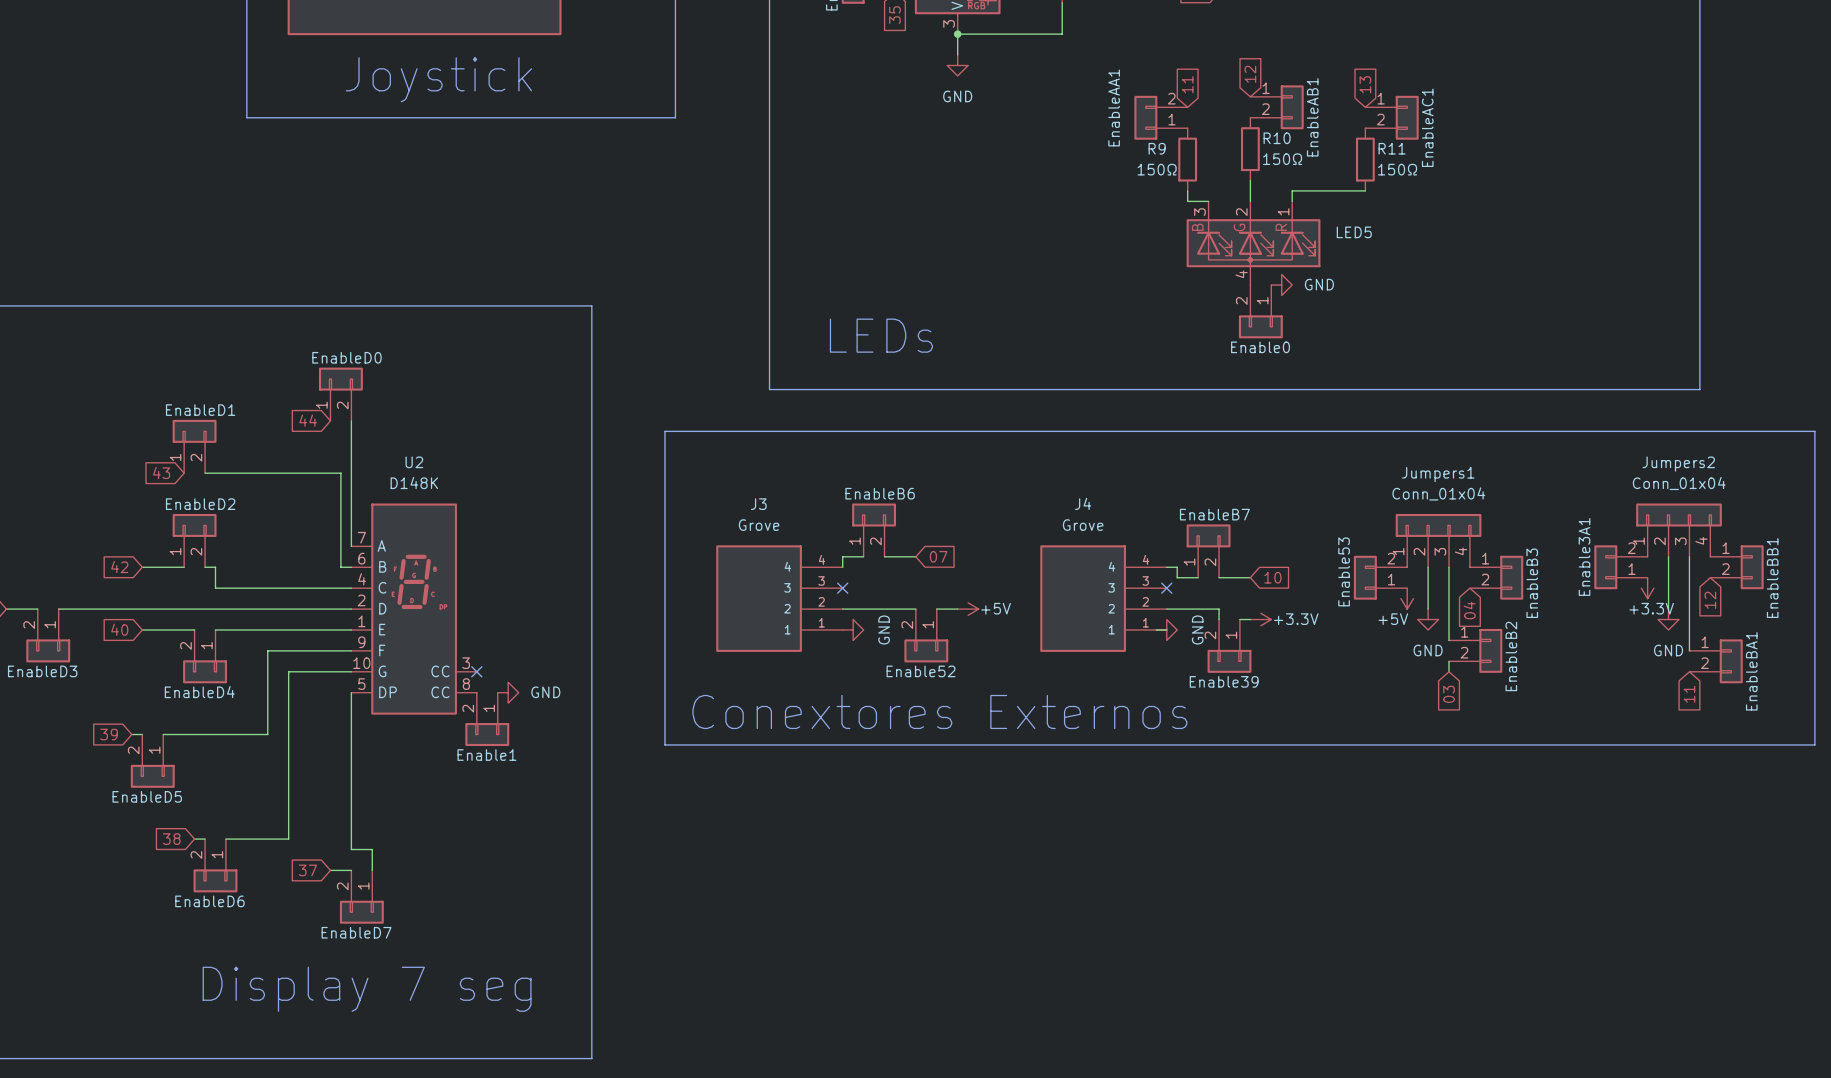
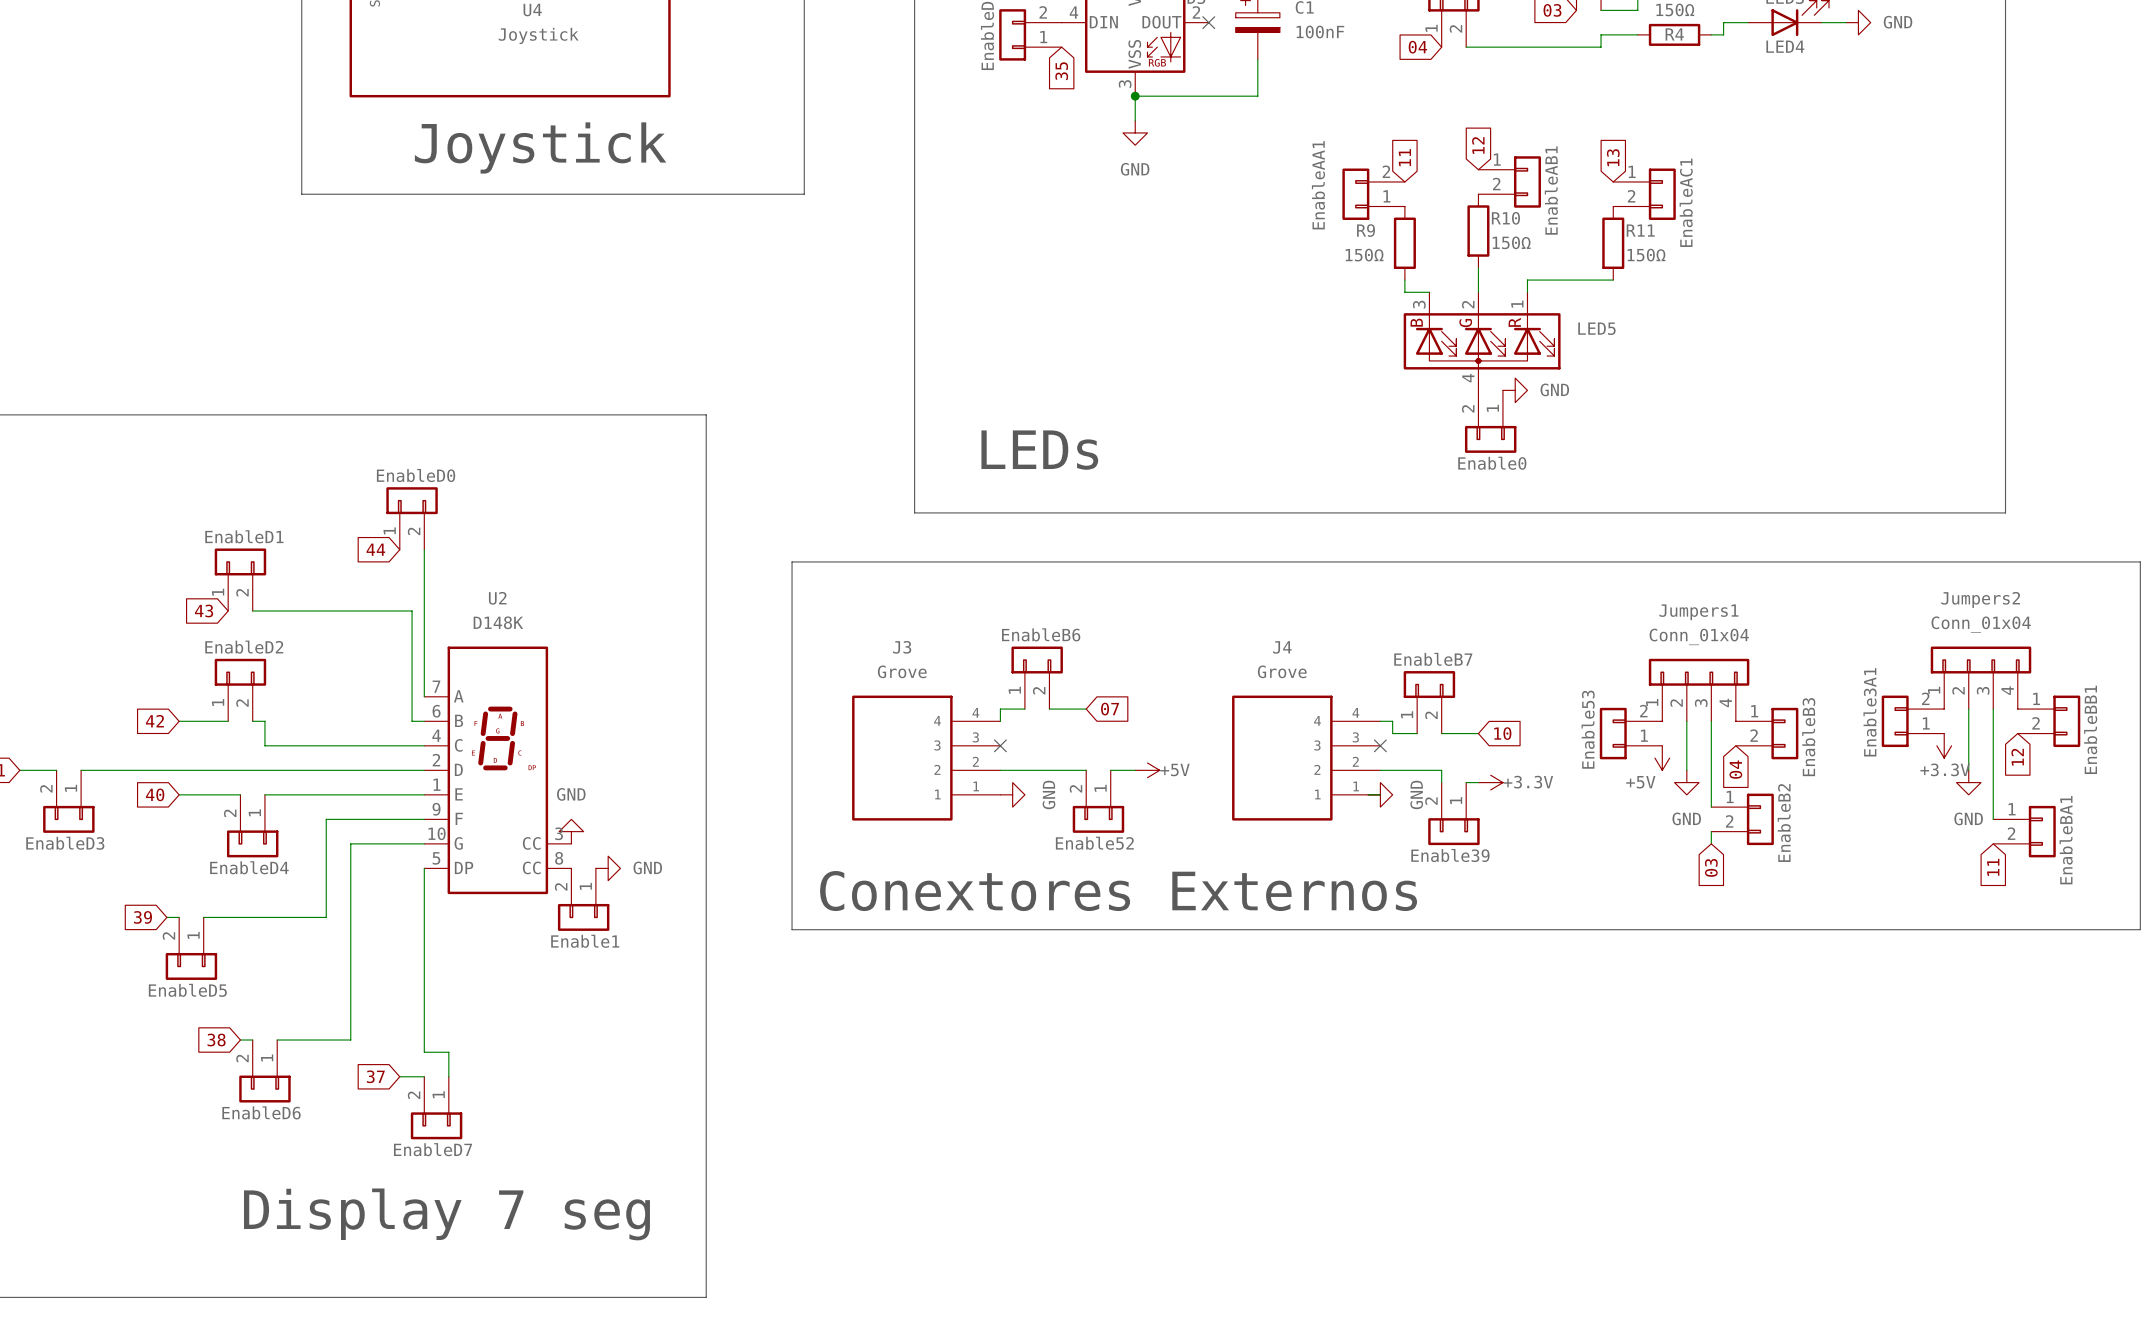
power symbol: none -> GND (571, 831)
no-connect mark: (476, 671) -> none

